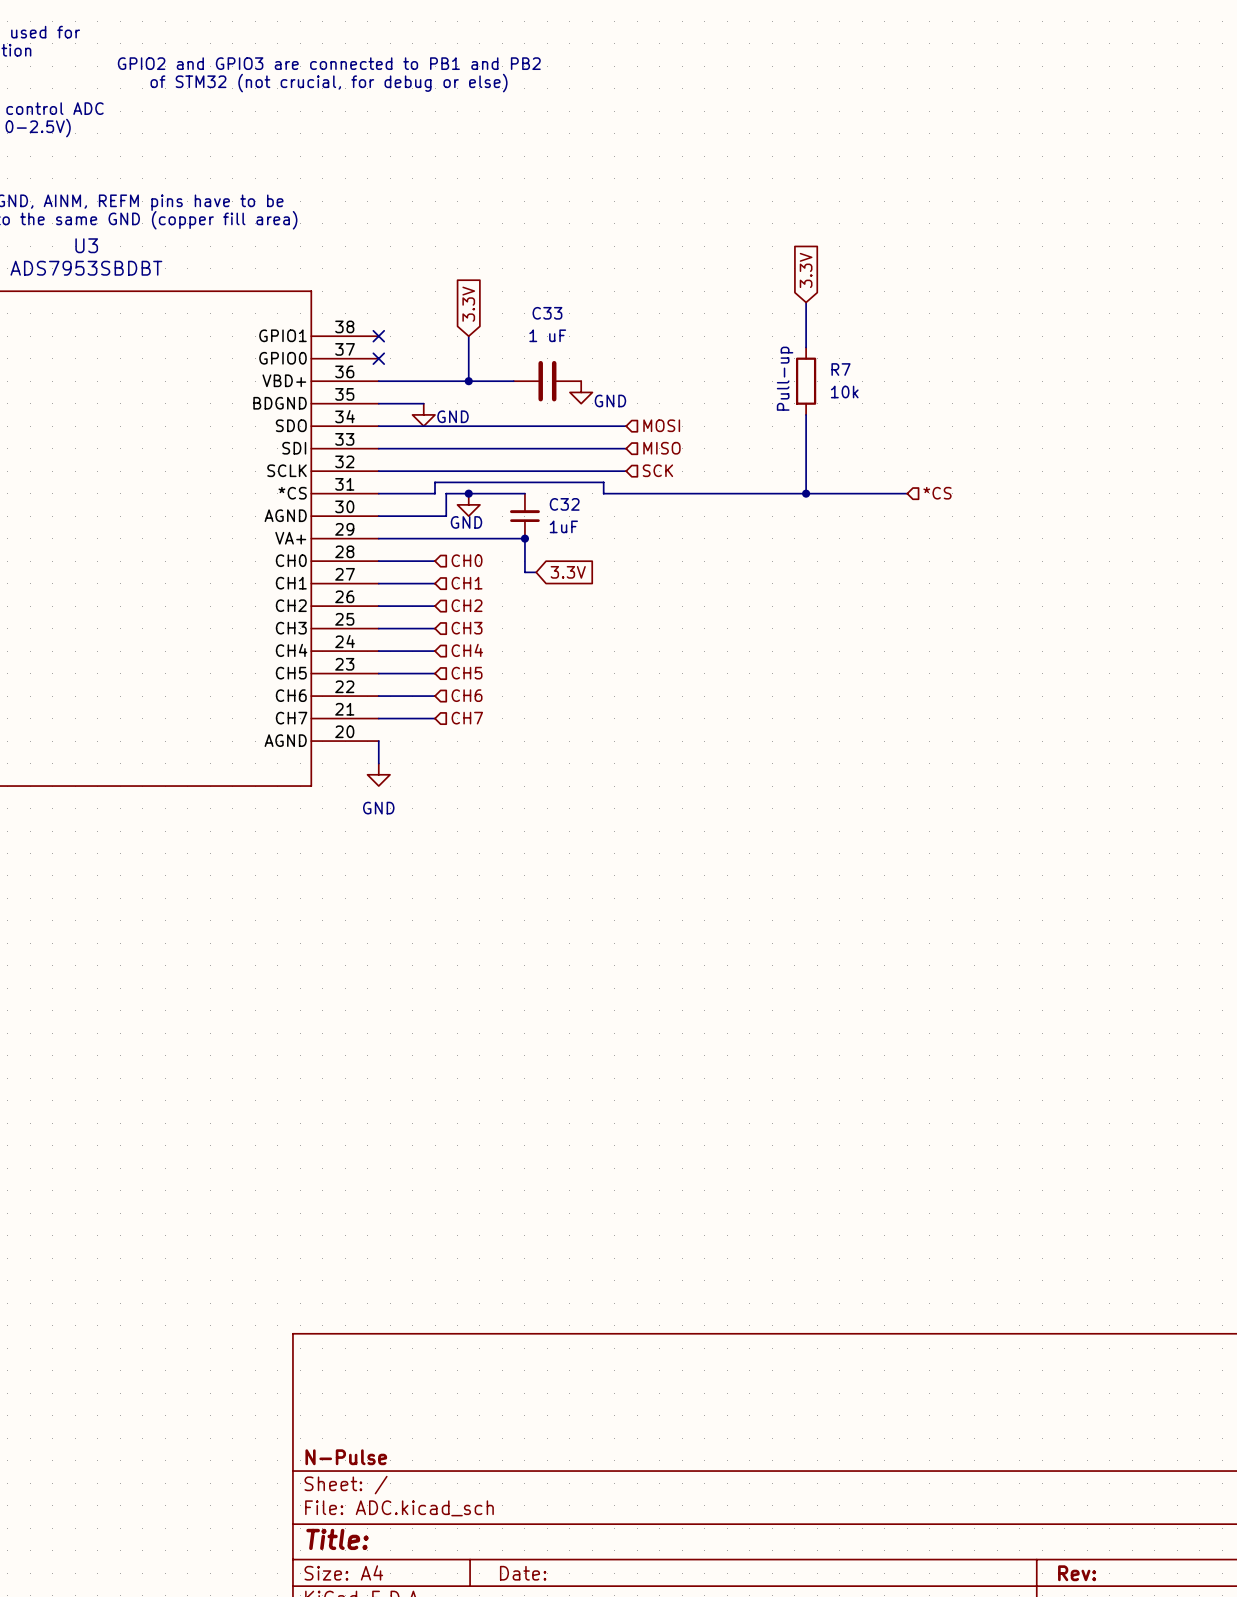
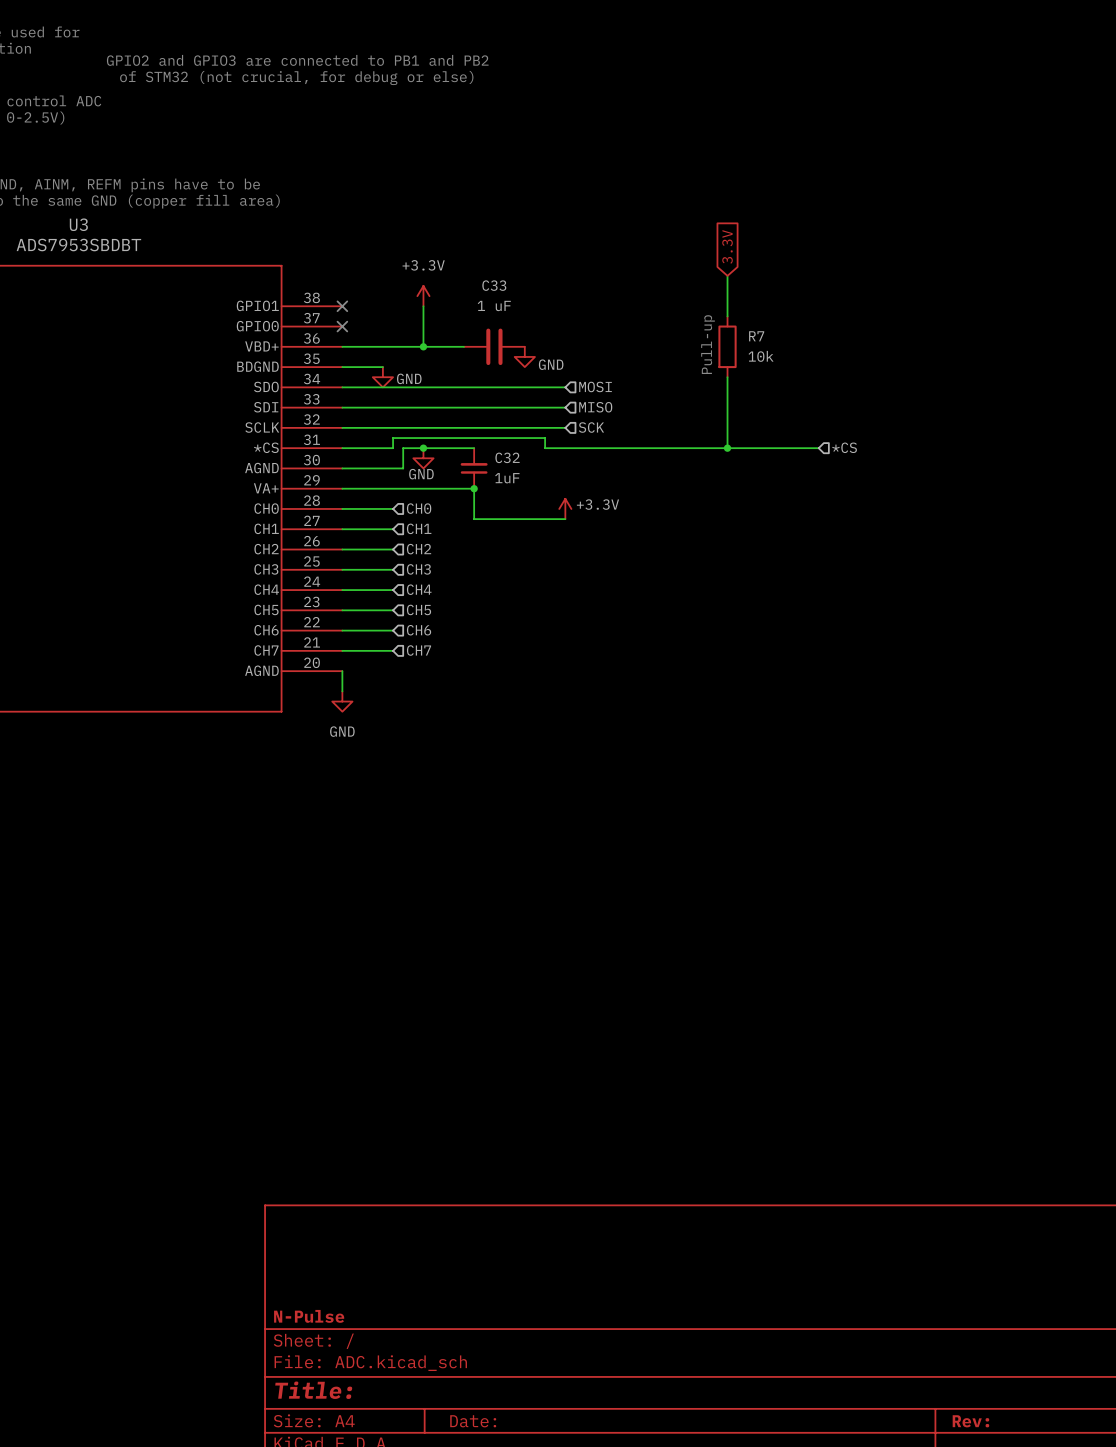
global label: 3.3V (468, 304) -> none
power symbol: none -> +3.3V (423, 296)
power symbol: none -> +3.3V (565, 508)
wire: none -> (484, 519) (565, 519)
global label: 3.3V (568, 572) -> none

